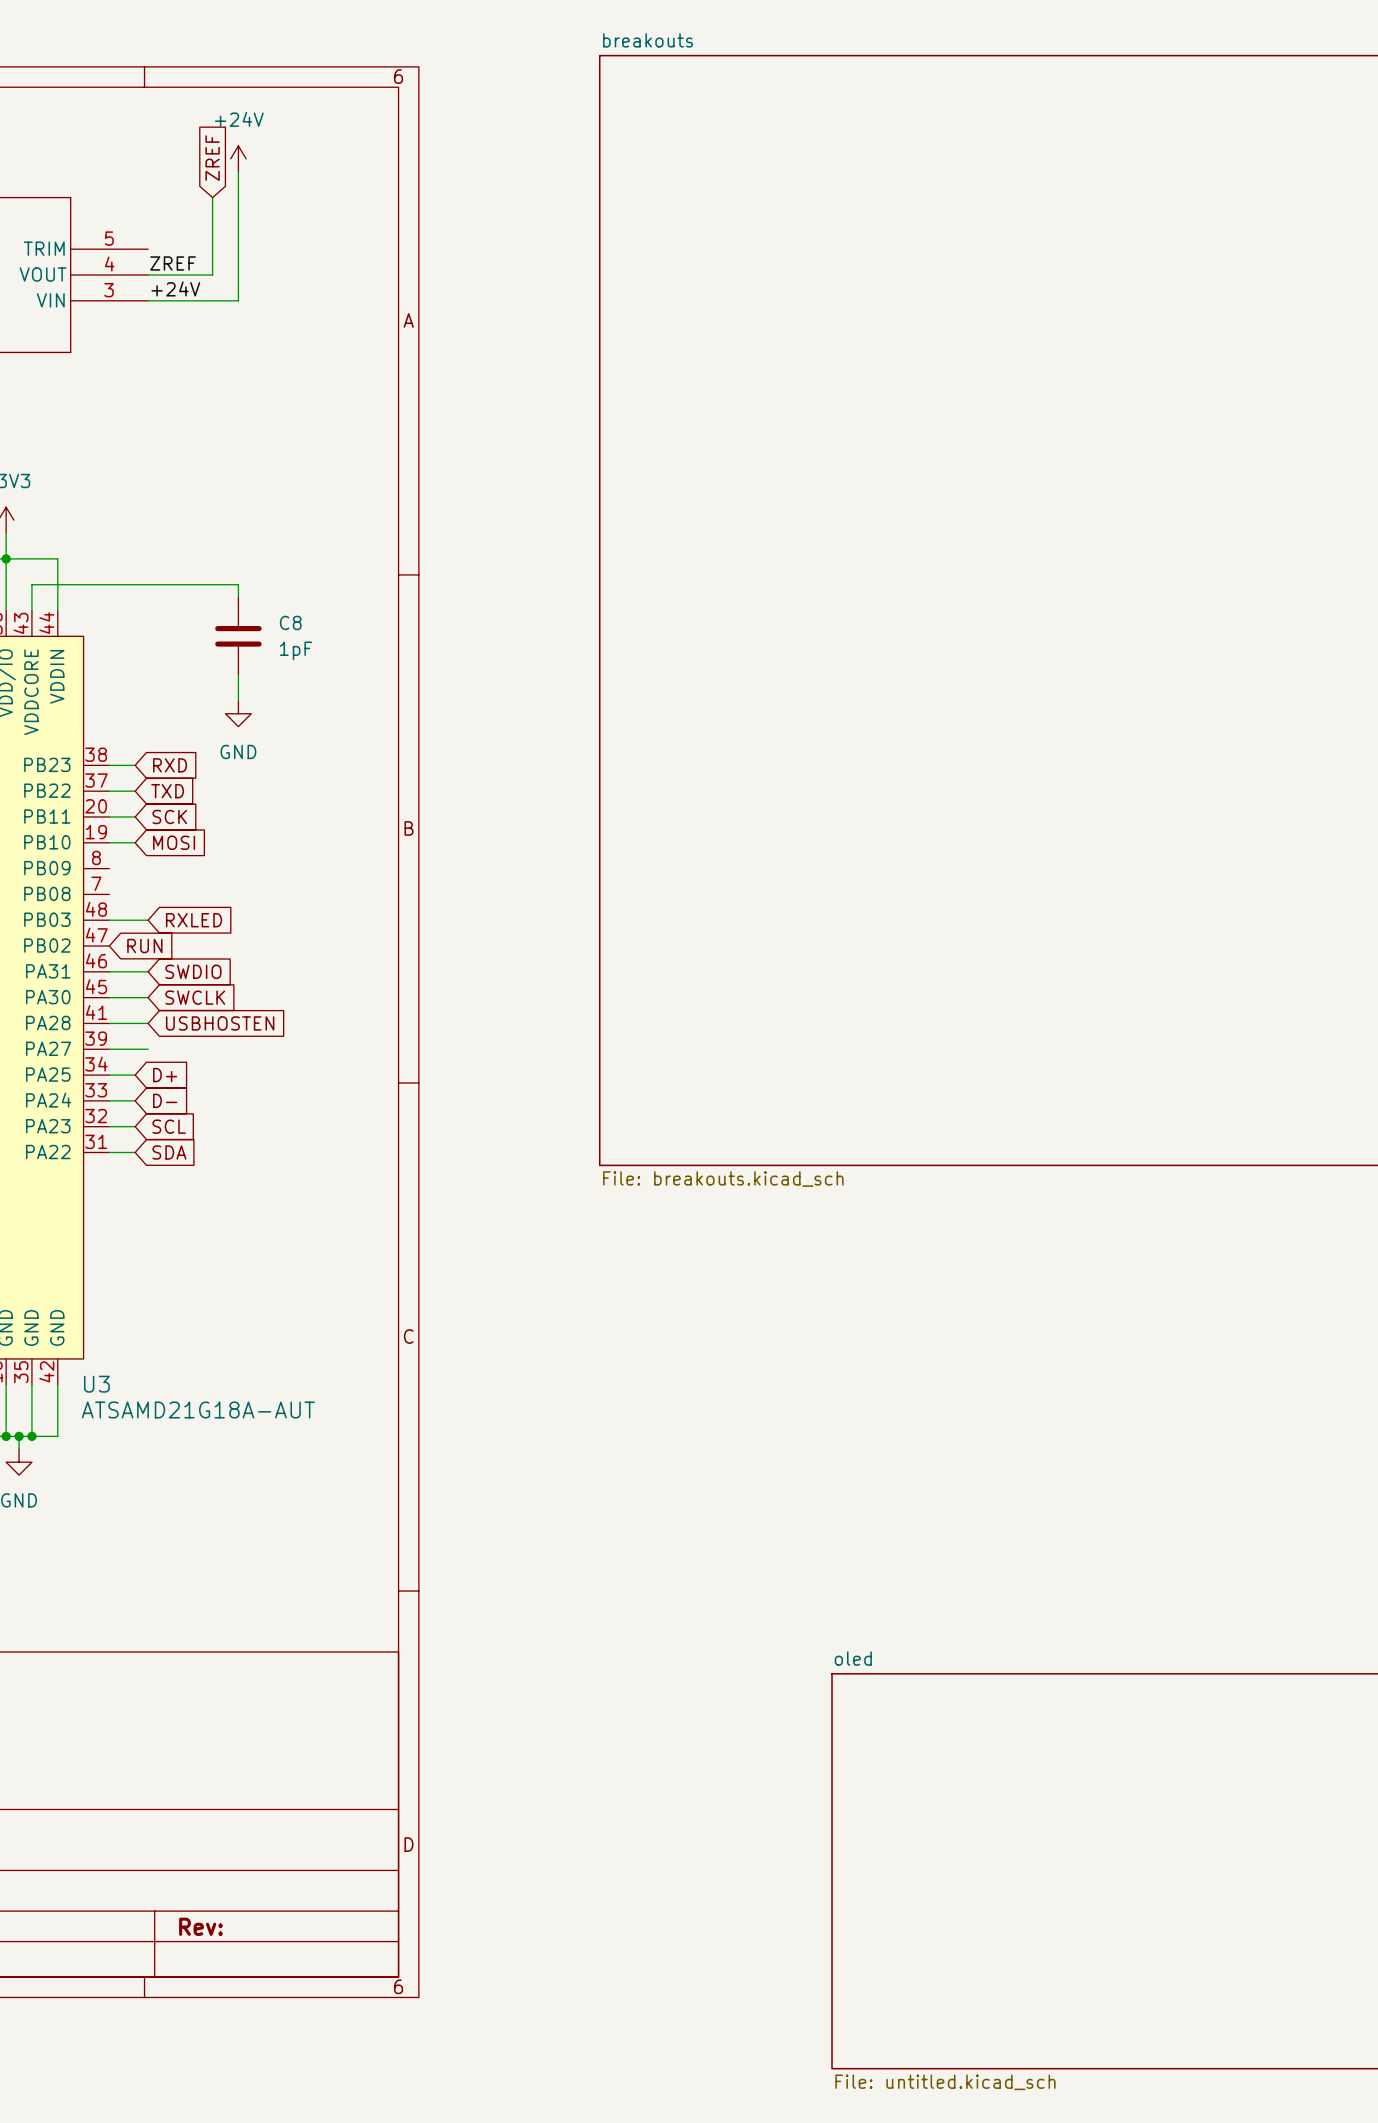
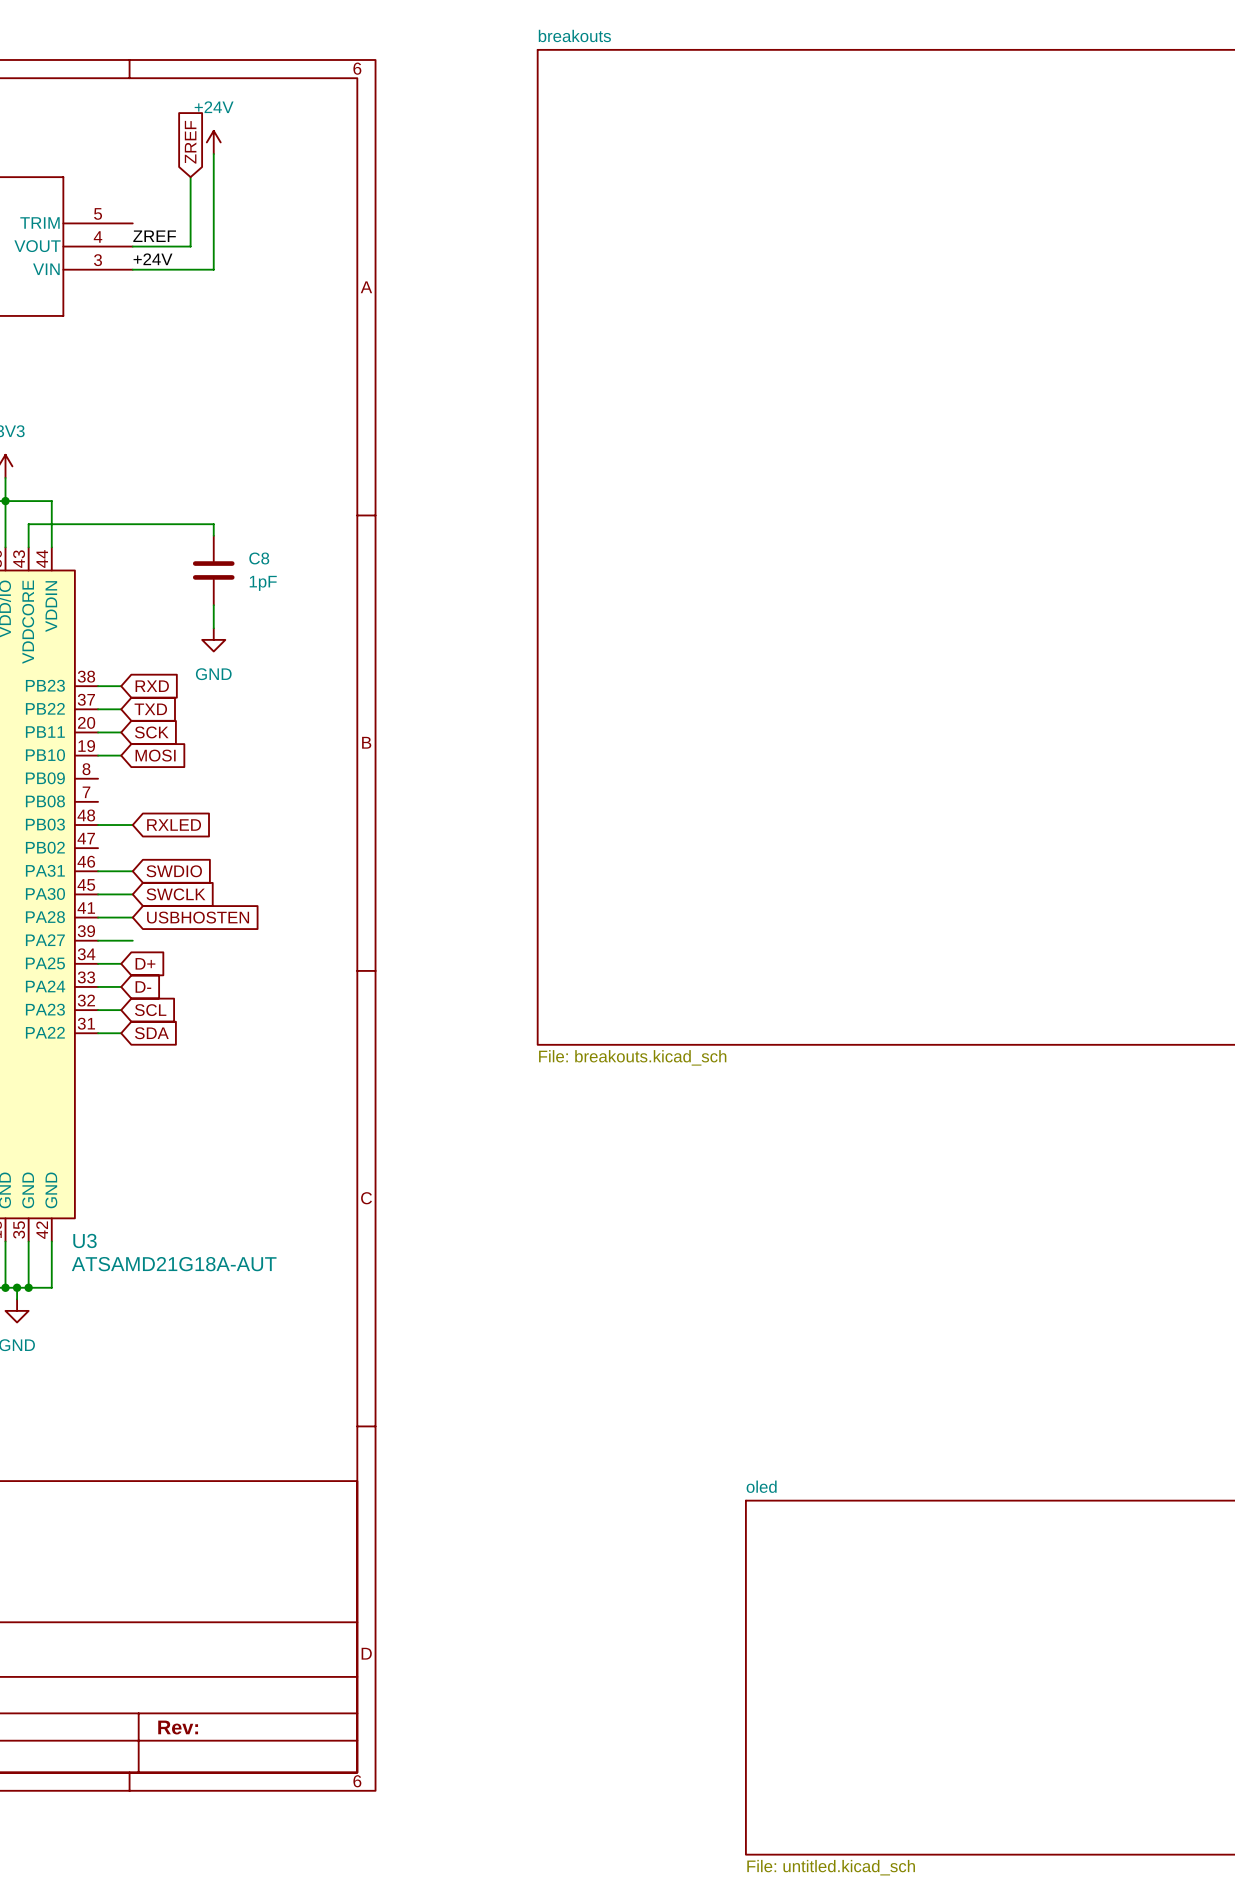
global label: RUN (144, 946) -> none

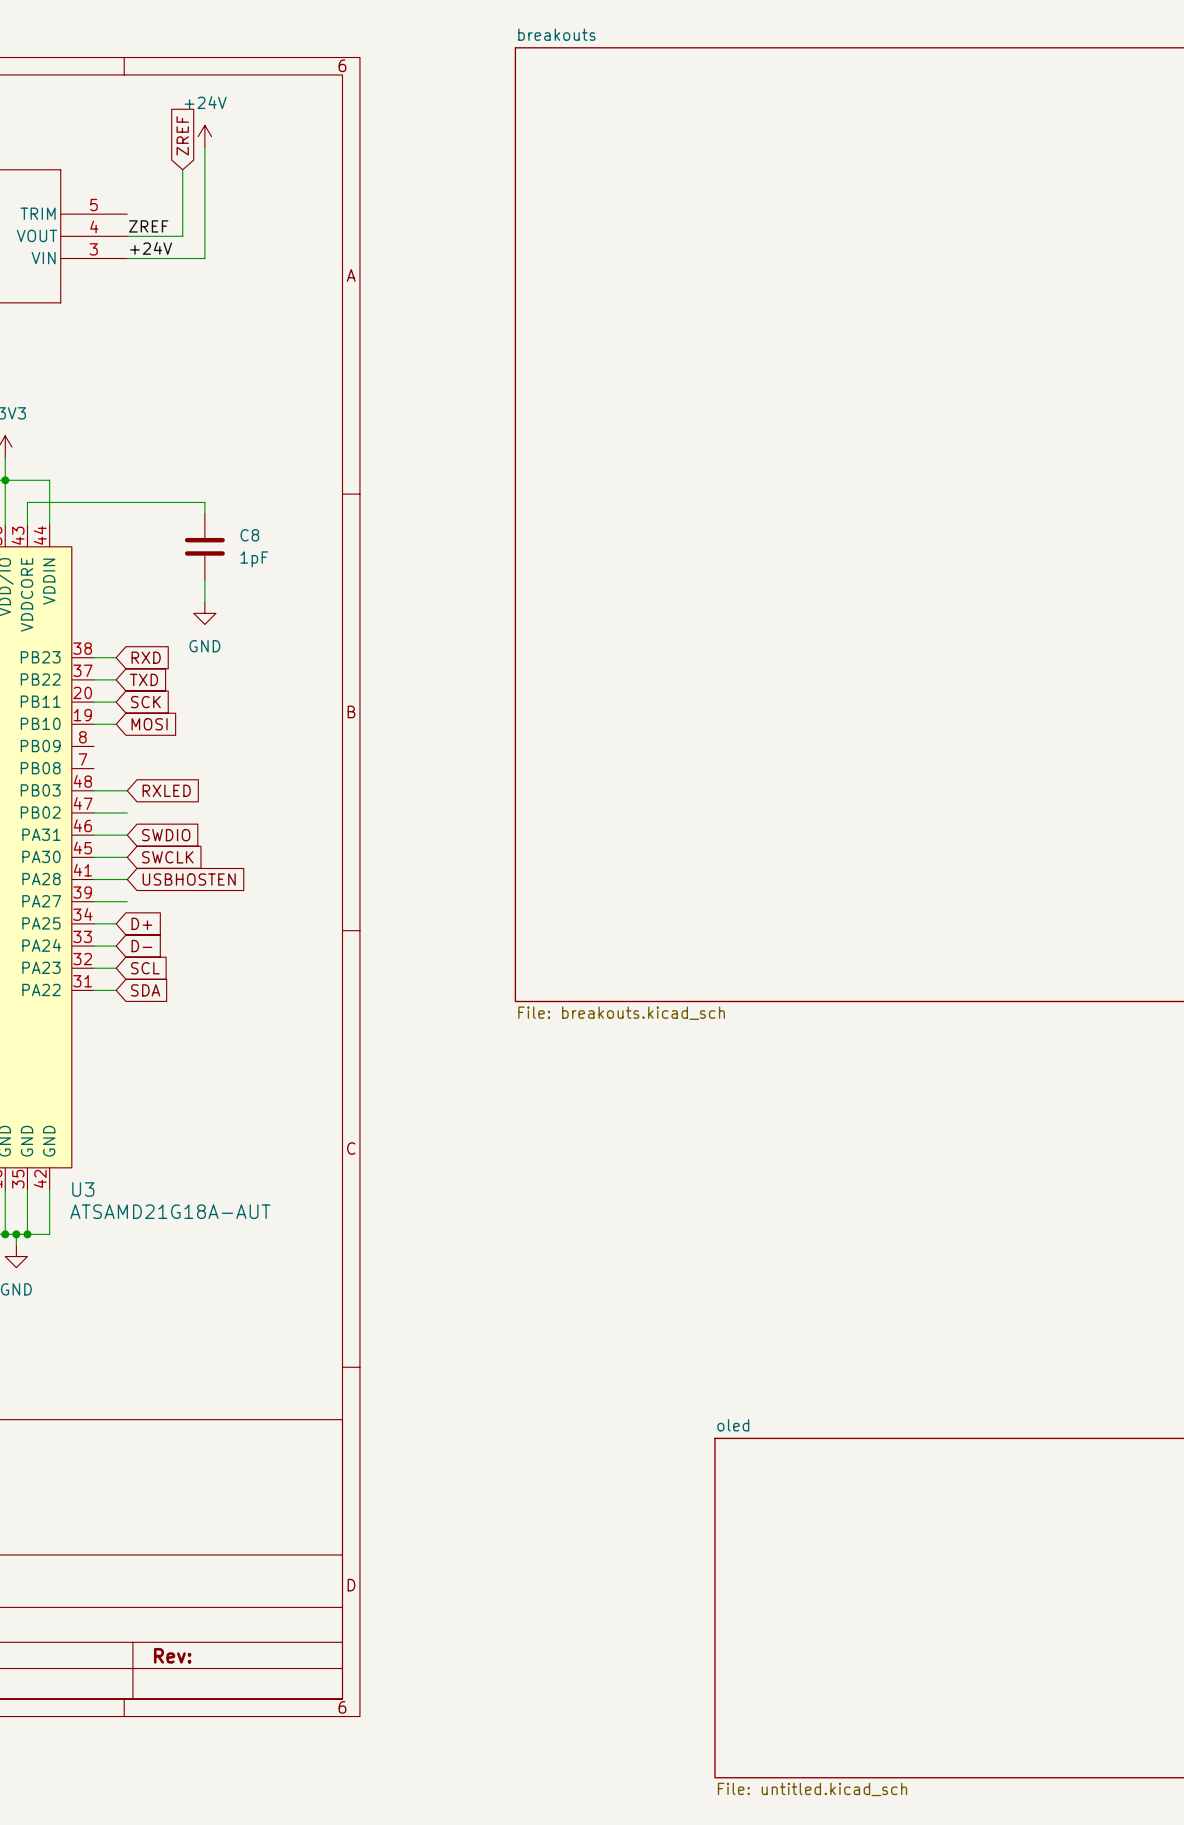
wire: none -> (93, 812) (127, 812)

